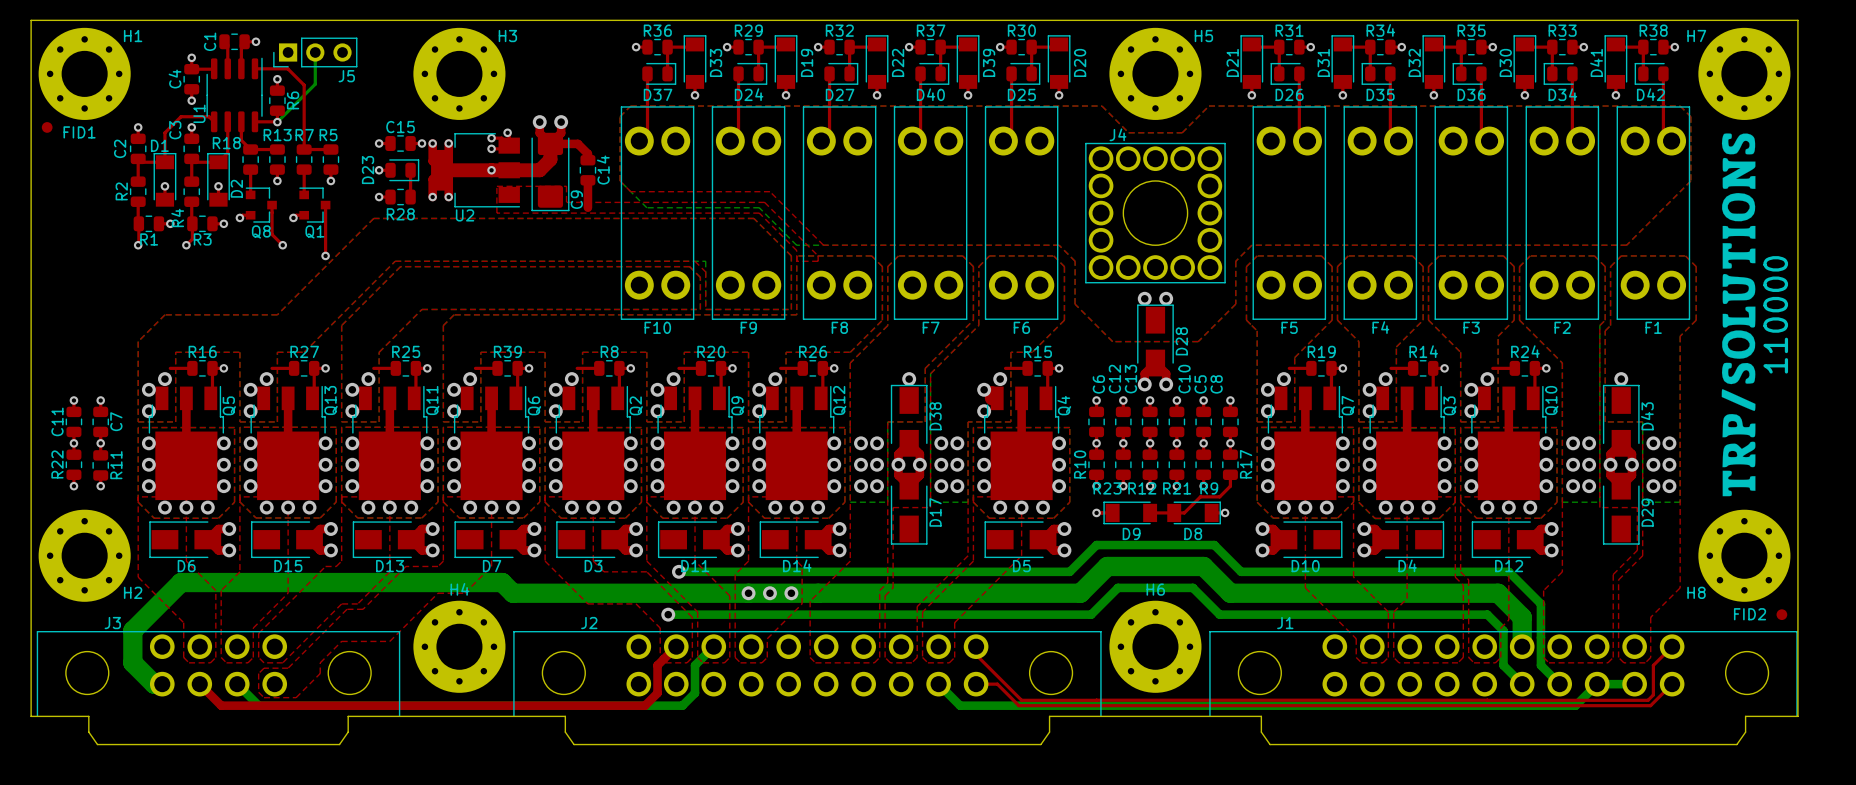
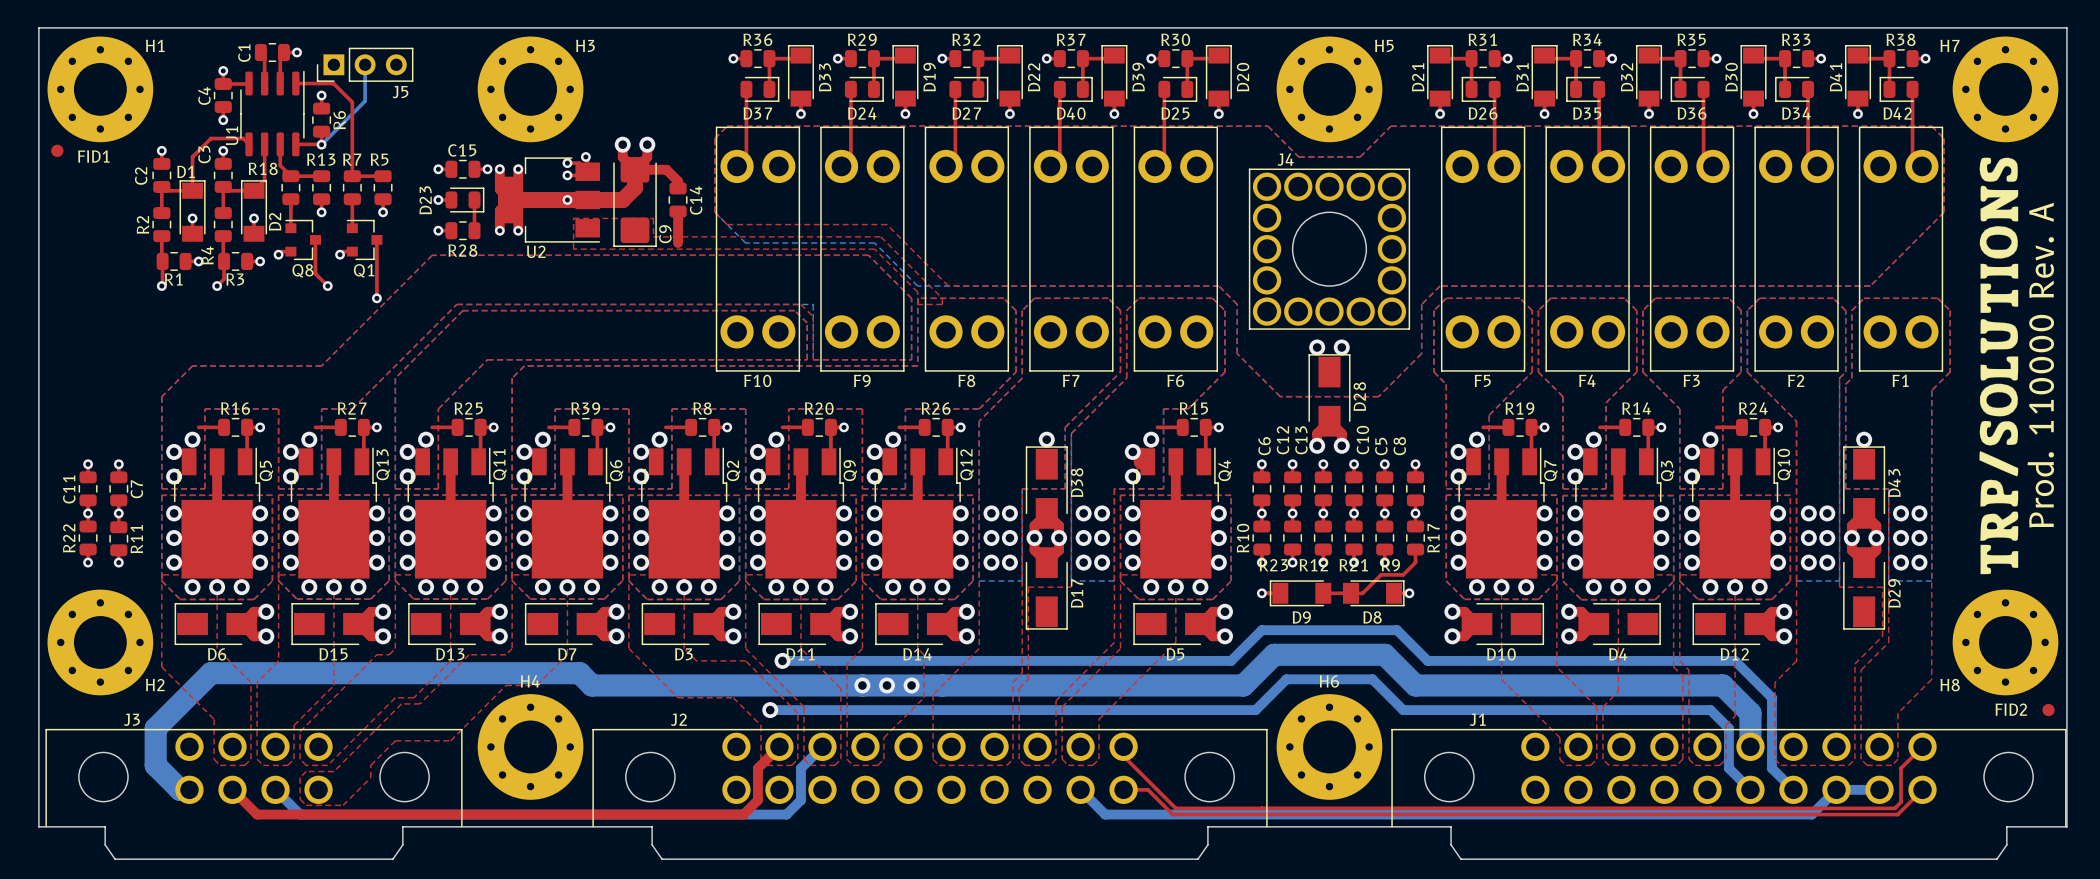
text: 110000 (1775, 314) -> Prod. 110000 Rev. A (2040, 365)

